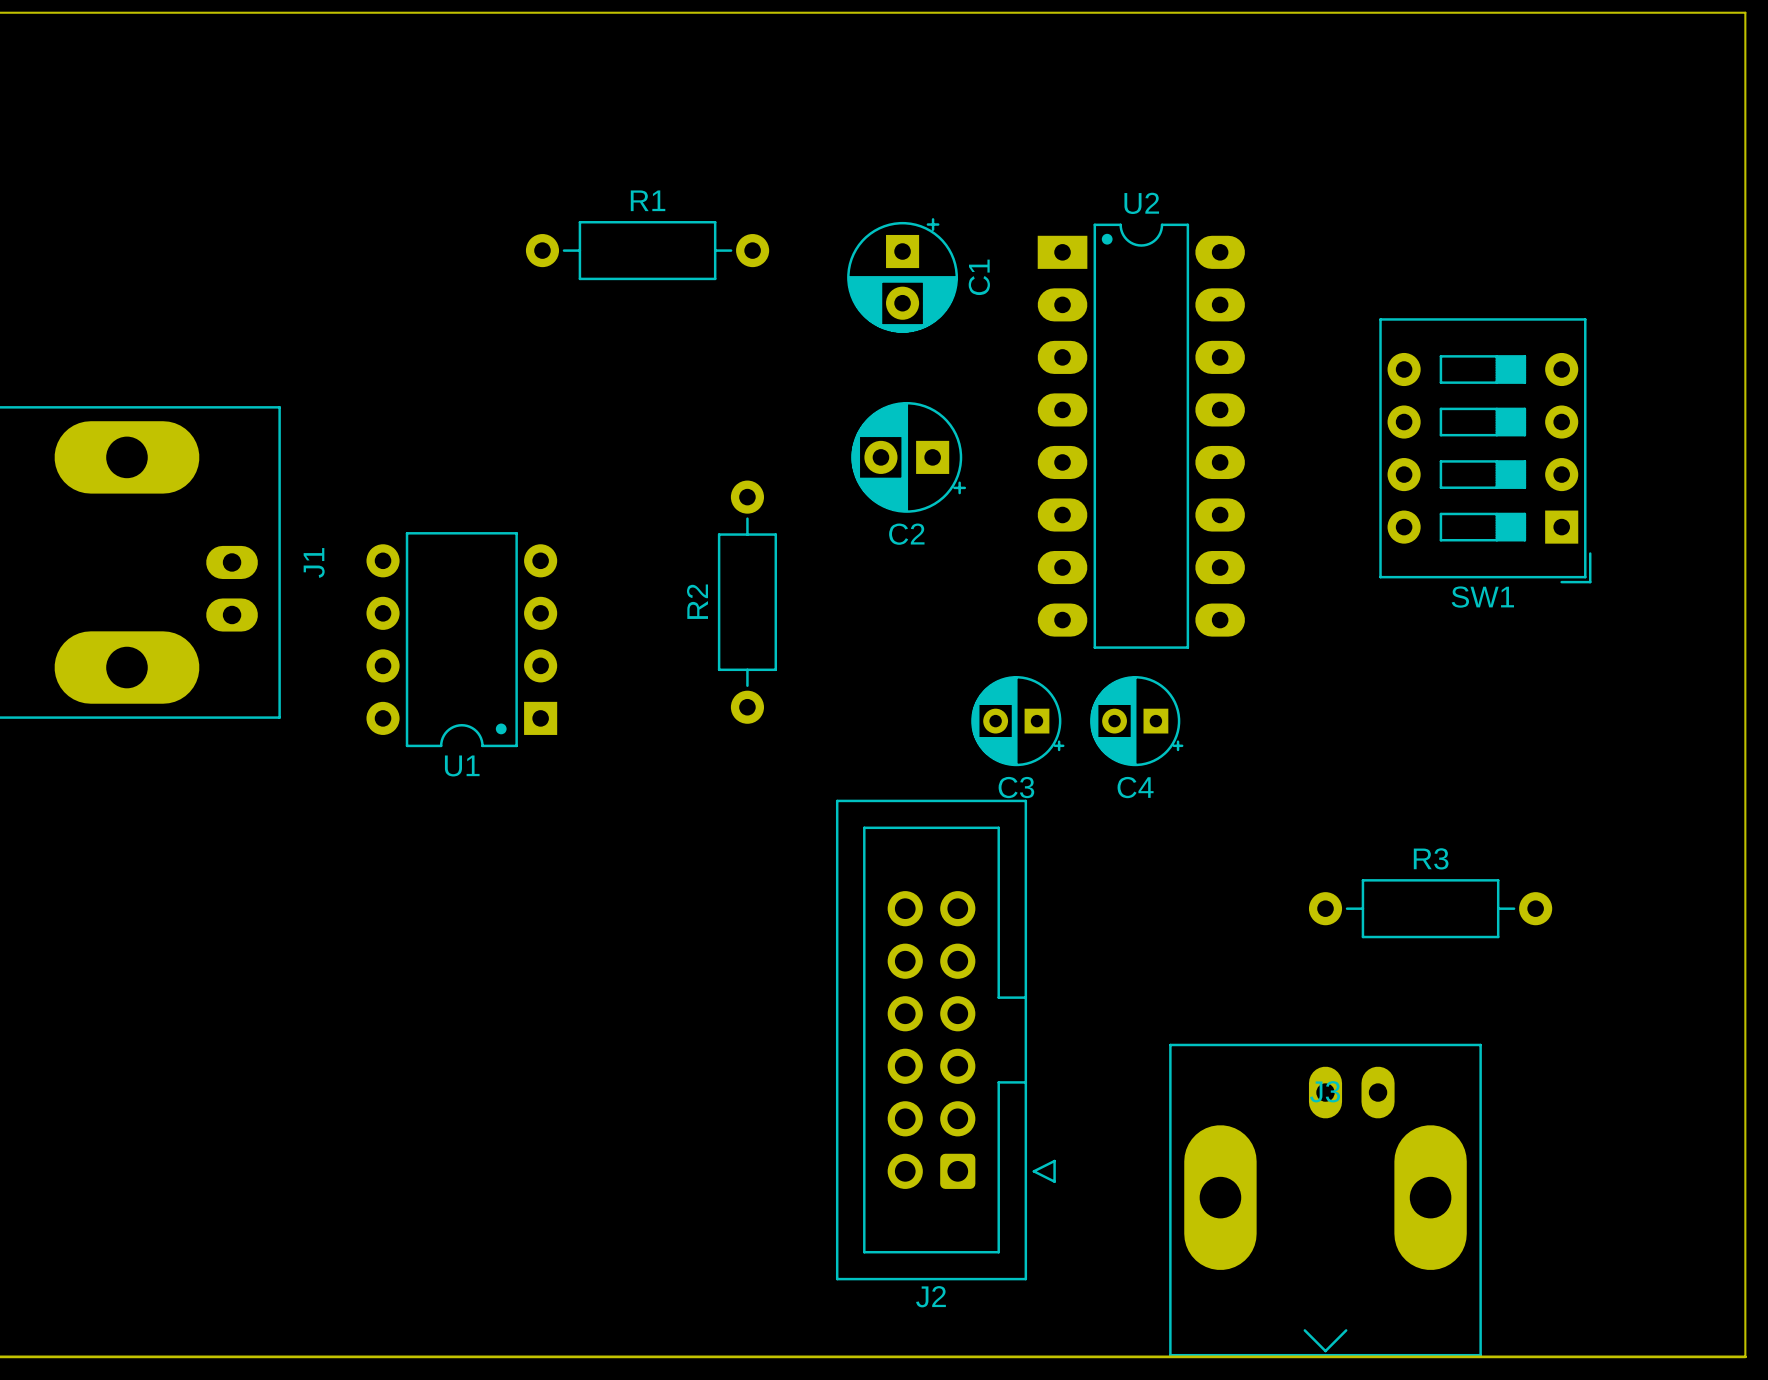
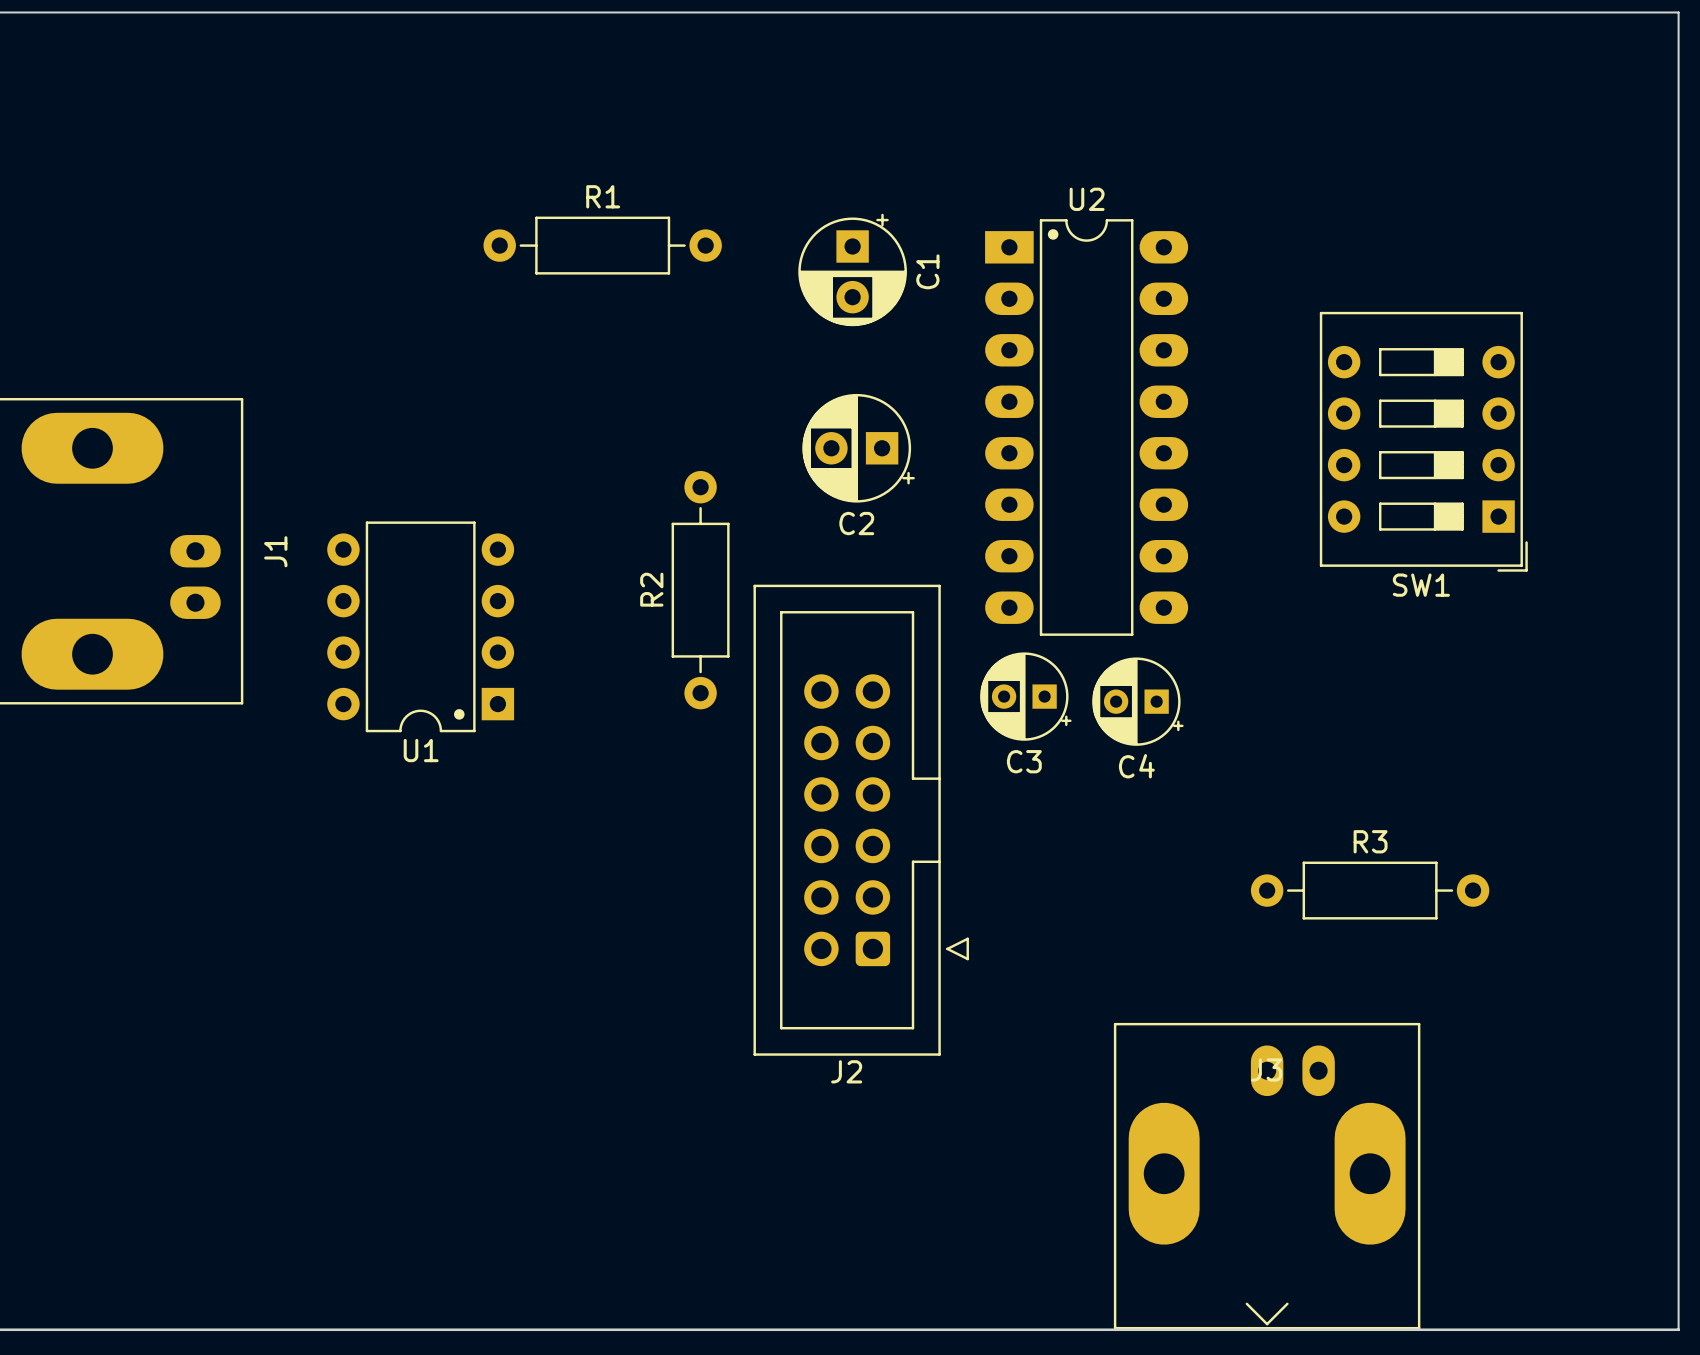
C3 position: (1017, 721) -> (1025, 696)
C4 position: (1136, 721) -> (1137, 701)
J2 position: (945, 1040) -> (861, 820)

